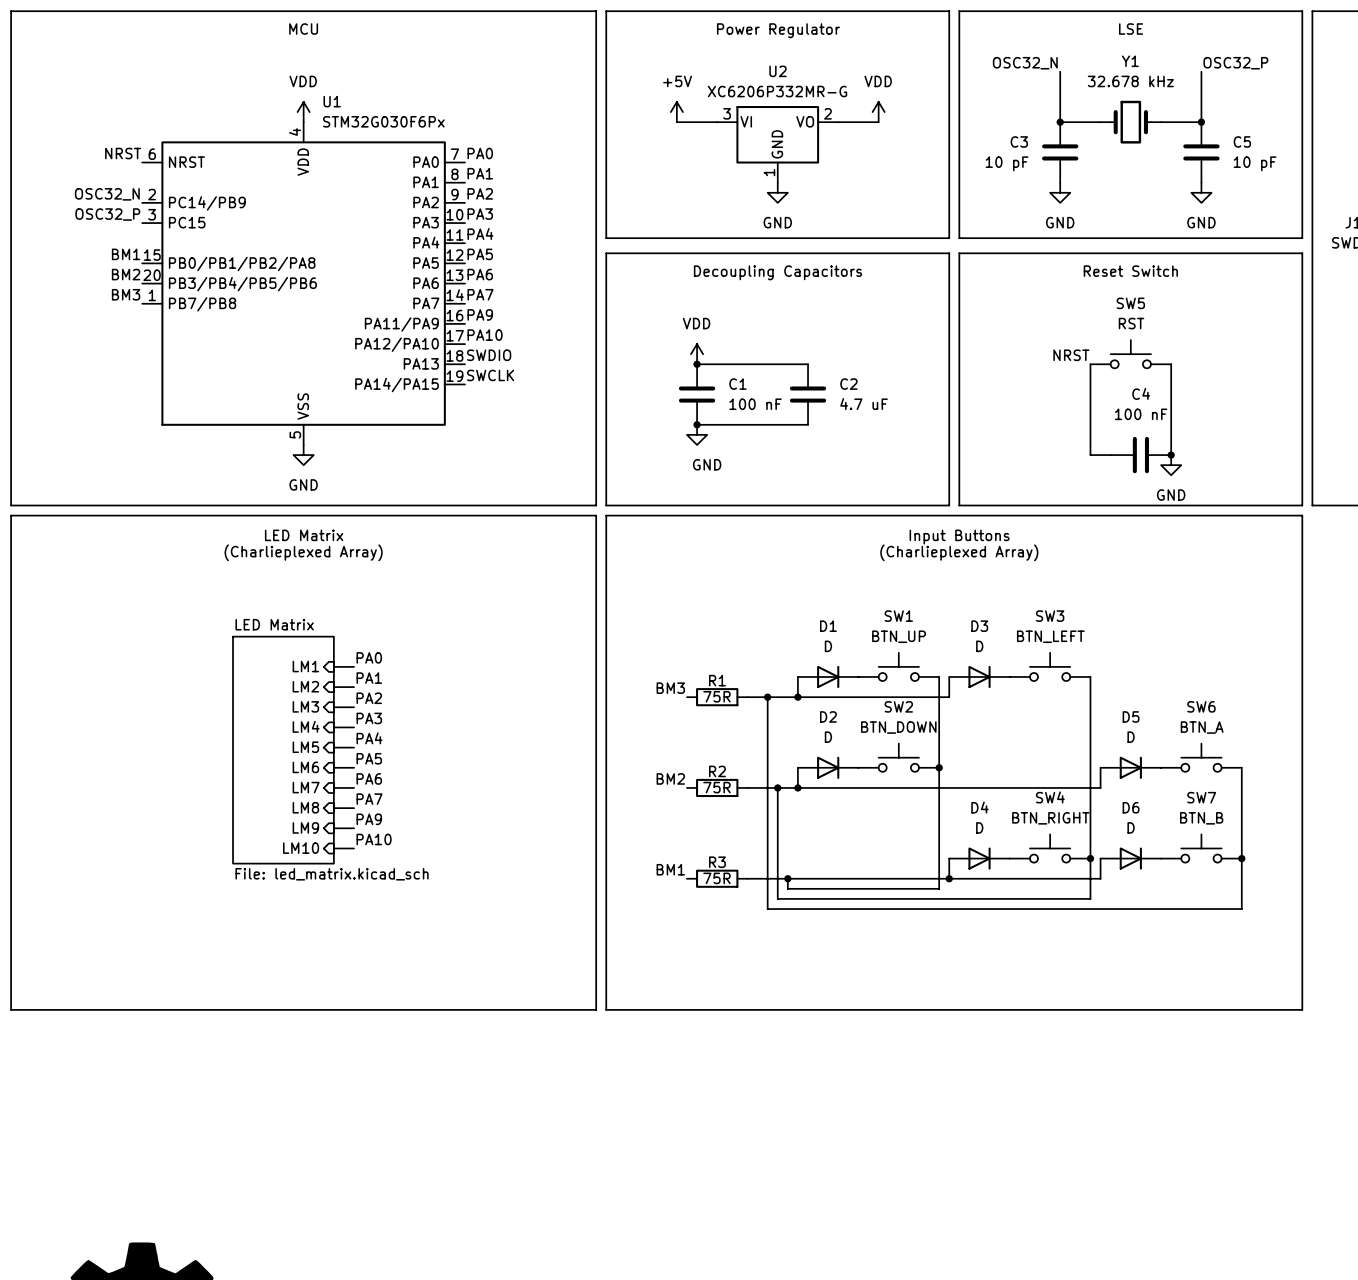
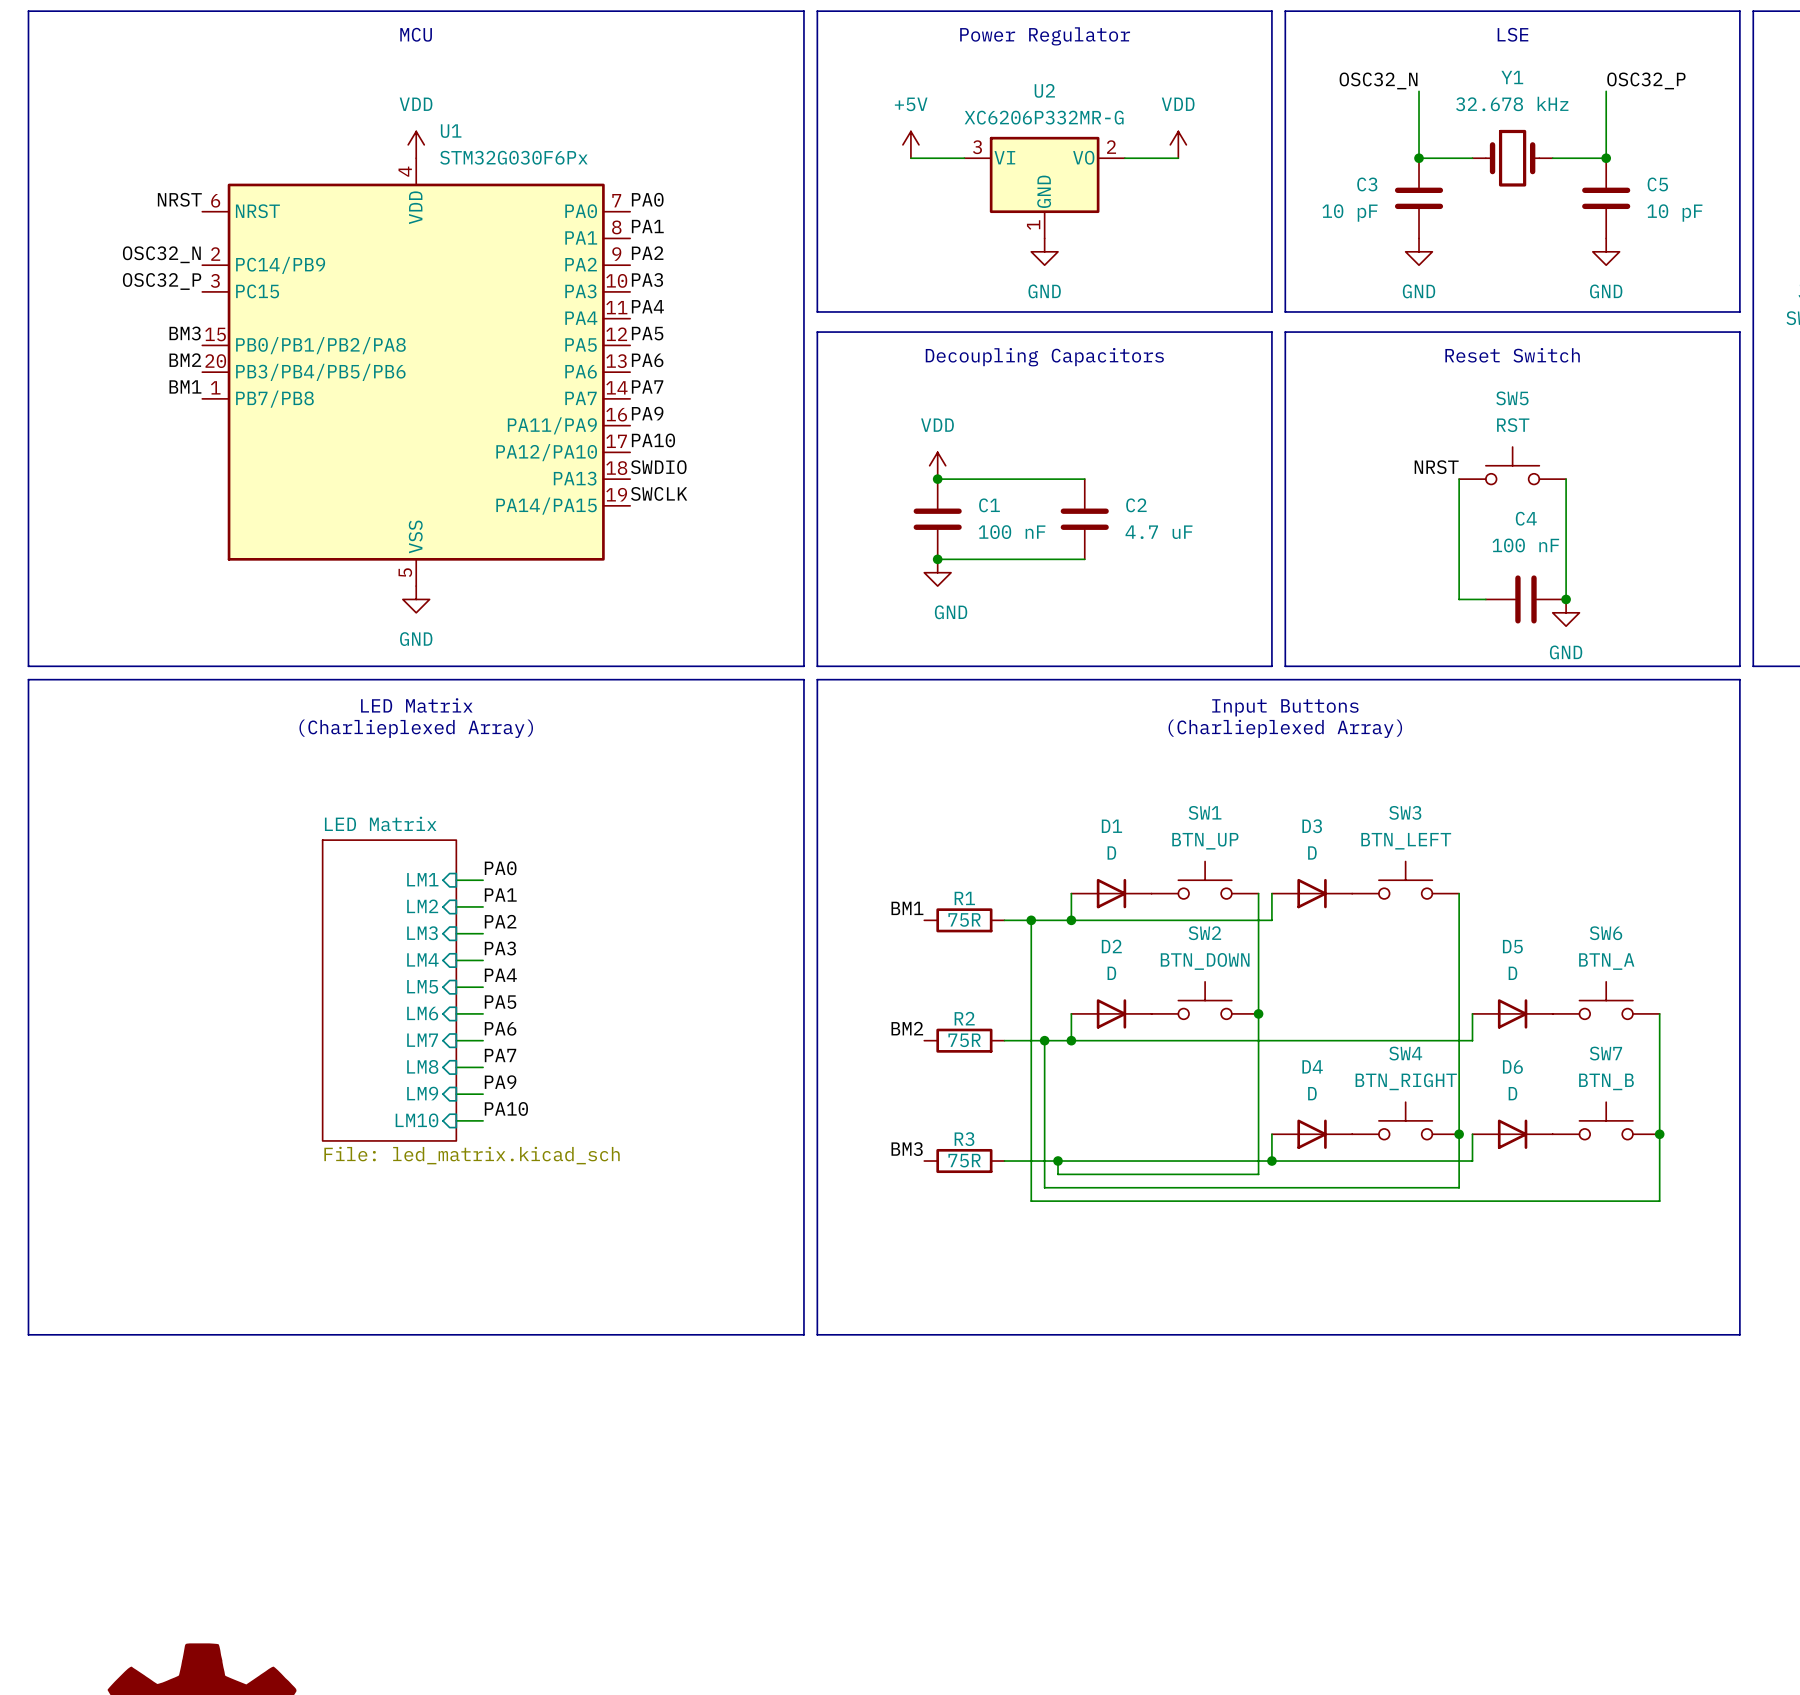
label: BM1 (126, 254) -> BM3 (185, 333)
label: BM3 (126, 294) -> BM1 (185, 386)
label: BM3 (670, 688) -> BM1 (907, 908)
label: BM1 (670, 869) -> BM3 (907, 1149)

